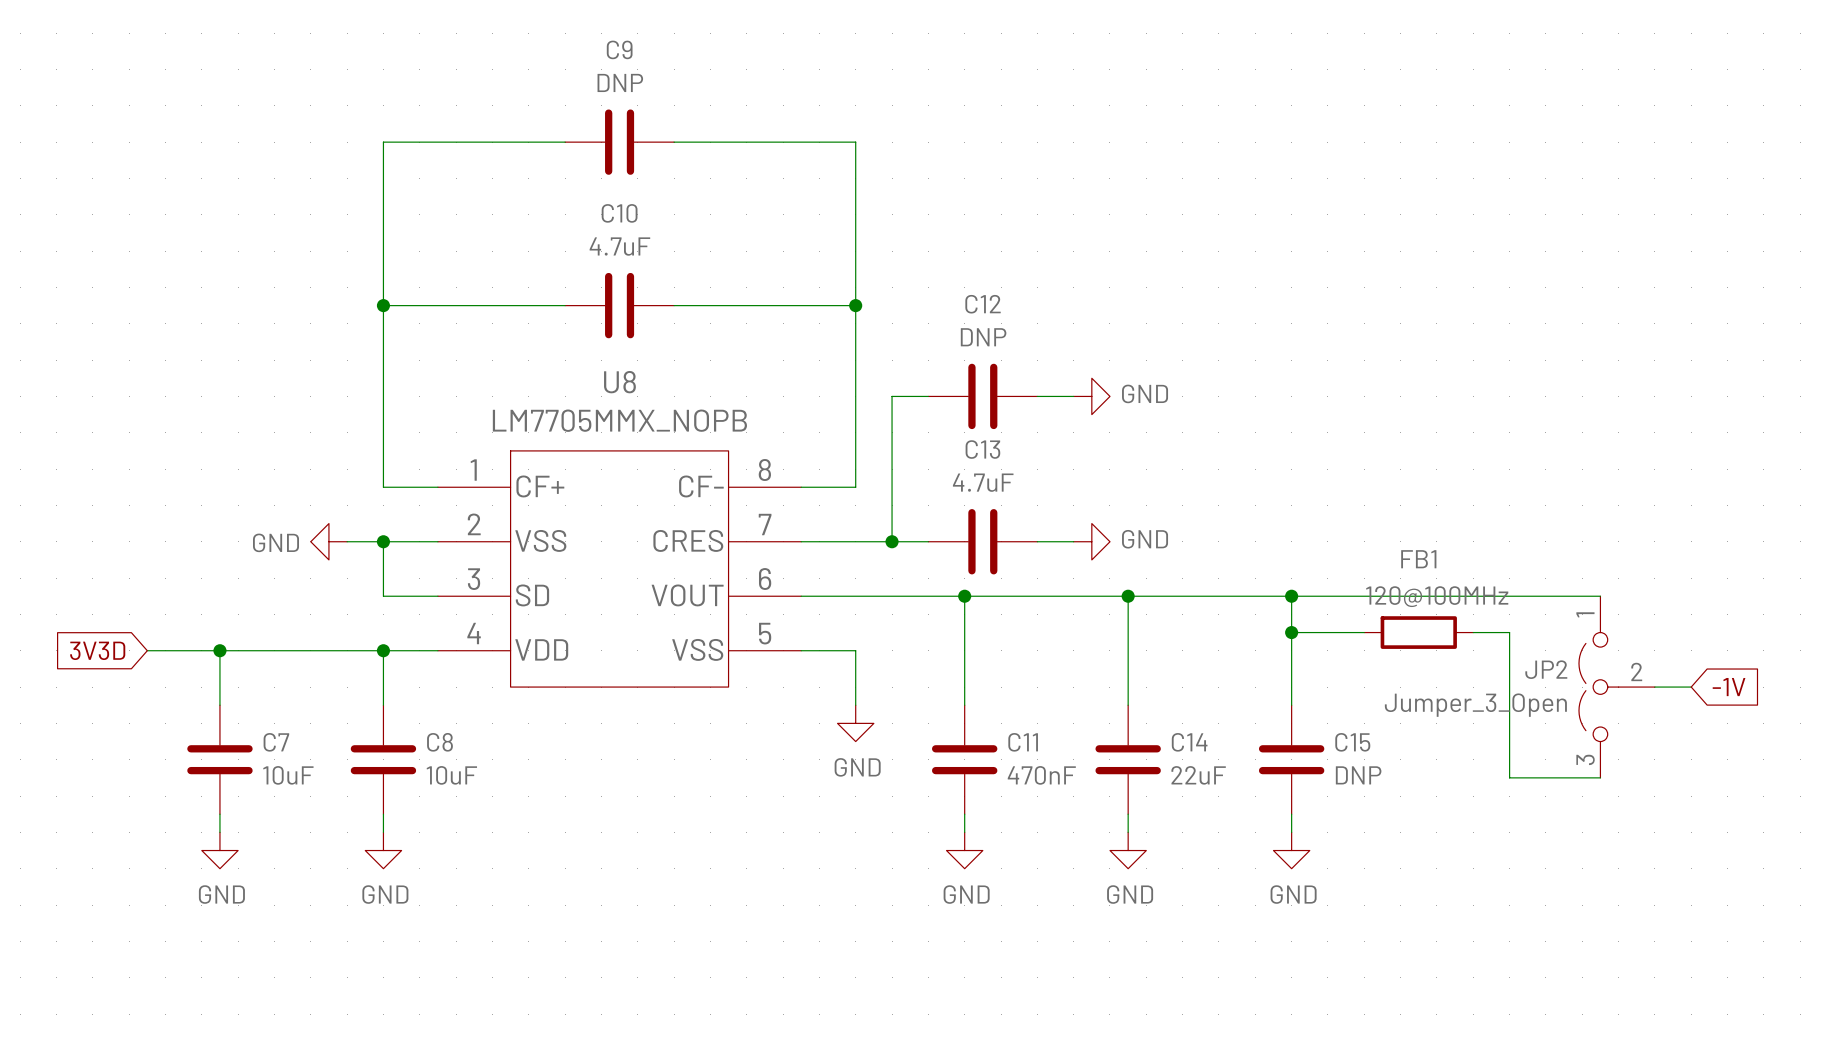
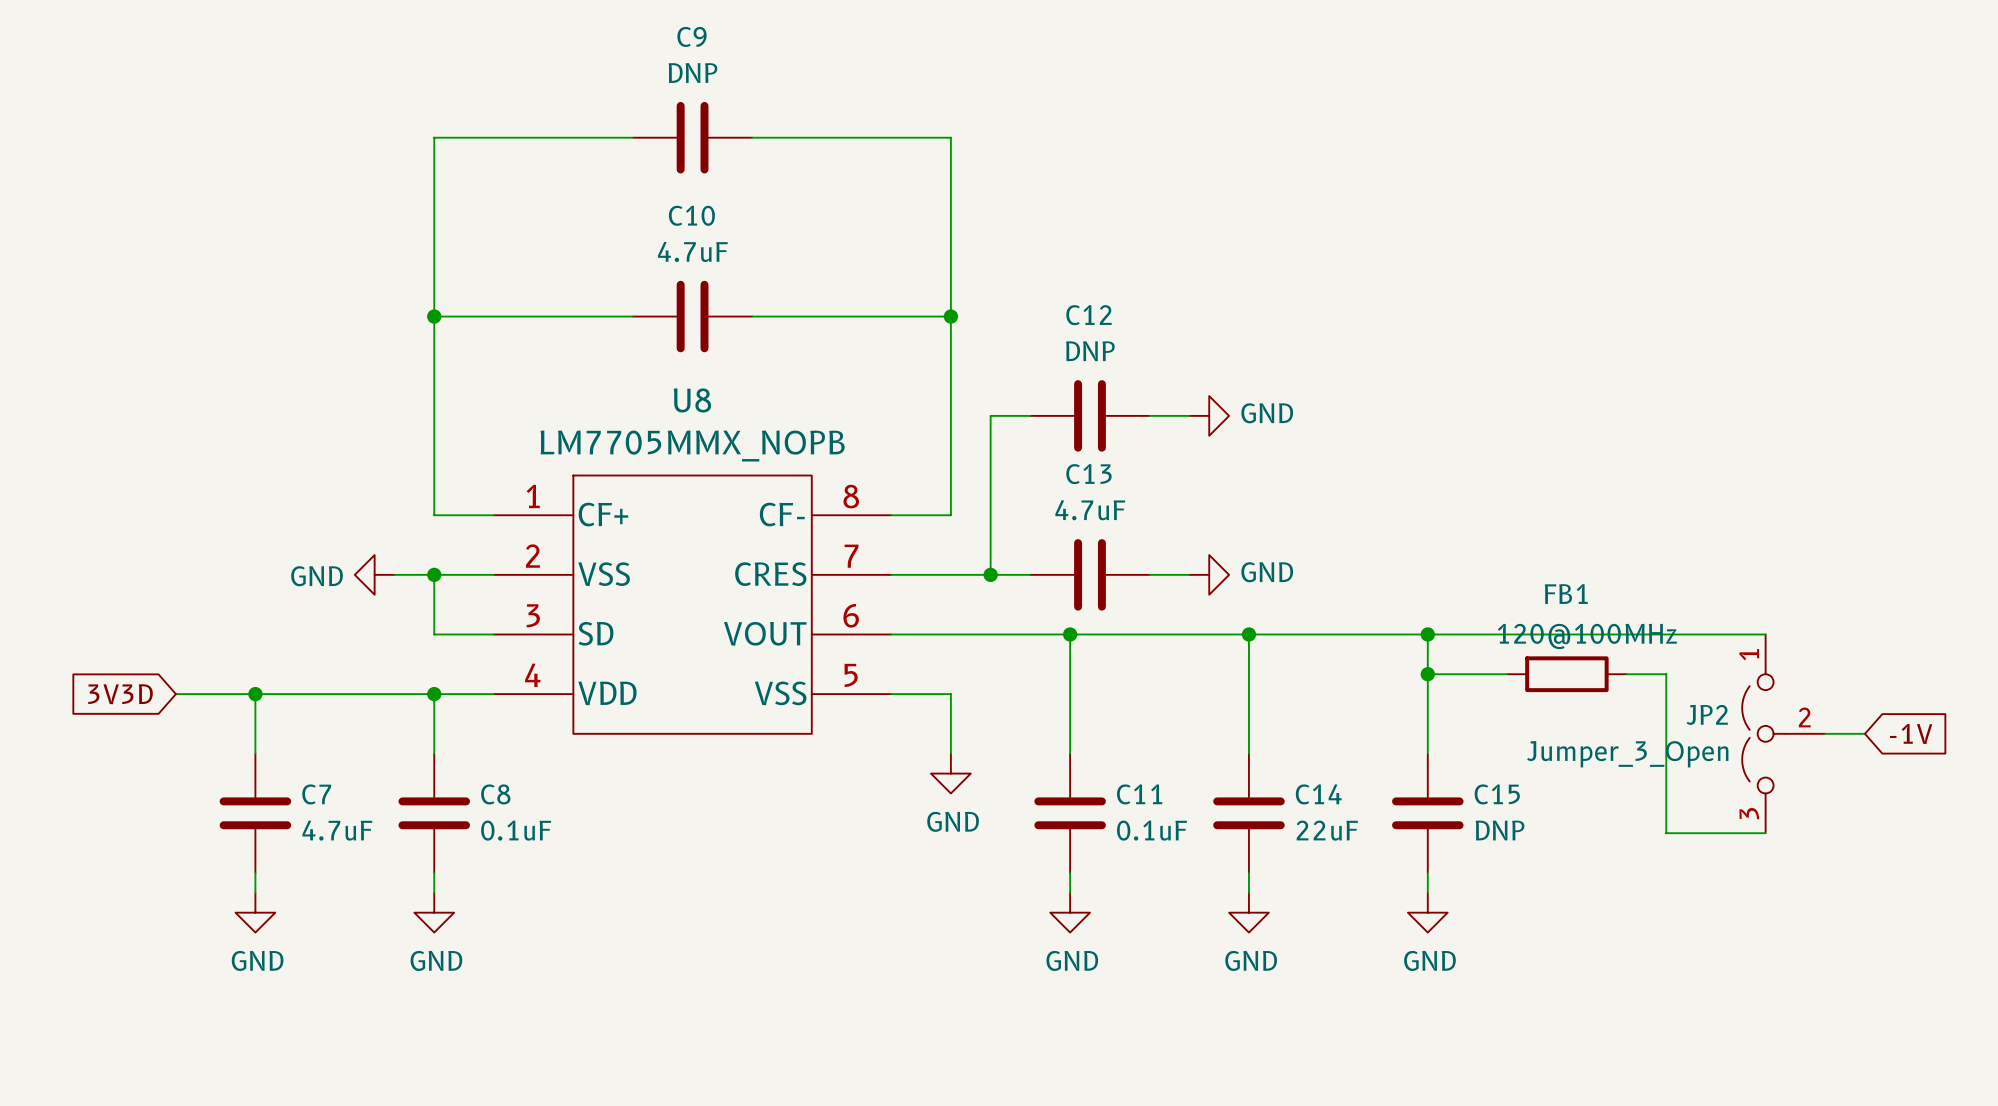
C7 value: 10uF (288, 775) -> 4.7uF (337, 830)
C8 value: 10uF (451, 775) -> 0.1uF (516, 830)
C11 value: 470nF (1041, 775) -> 0.1uF (1152, 830)

